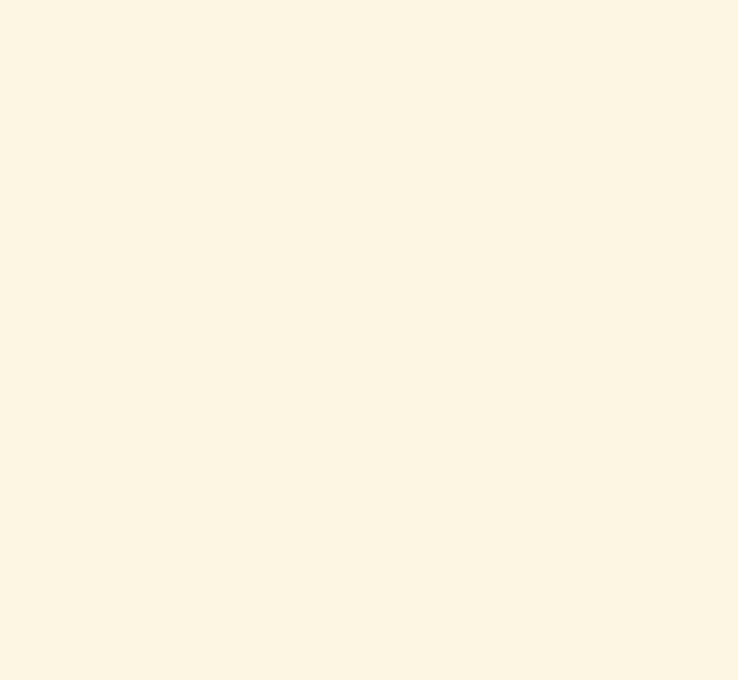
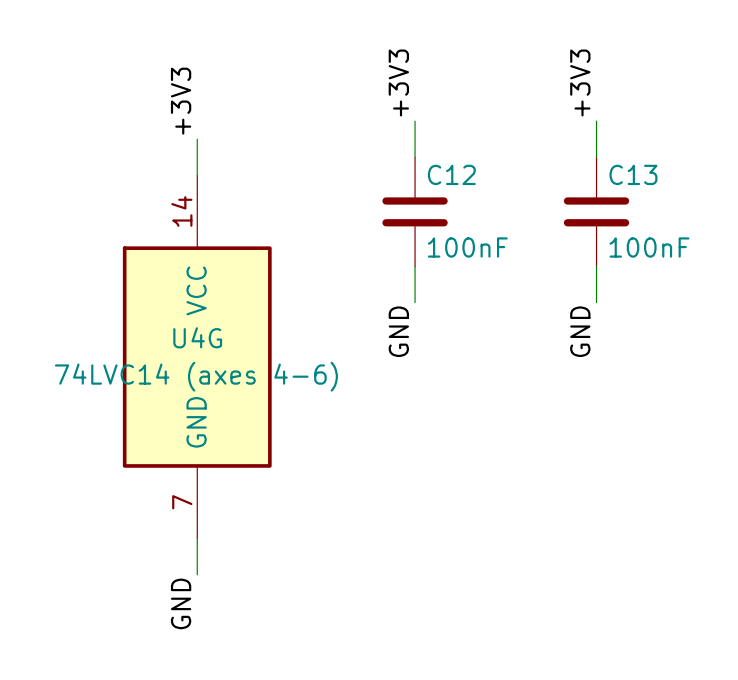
label: none -> +3V3 (398, 82)
label: none -> +3V3 (580, 82)
label: none -> +3V3 (181, 101)
wire: none -> (415, 121) (415, 157)
wire: none -> (596, 121) (596, 157)
wire: none -> (197, 139) (197, 175)
C12: none -> 100nF (415, 211)
C13: none -> 100nF (596, 211)
wire: none -> (415, 266) (415, 302)
wire: none -> (596, 266) (596, 302)
label: none -> GND (398, 331)
label: none -> GND (580, 331)
U4G: none -> 74LVC14 (axes 4-6) (197, 357)
wire: none -> (197, 538) (197, 574)
label: none -> GND (181, 603)

